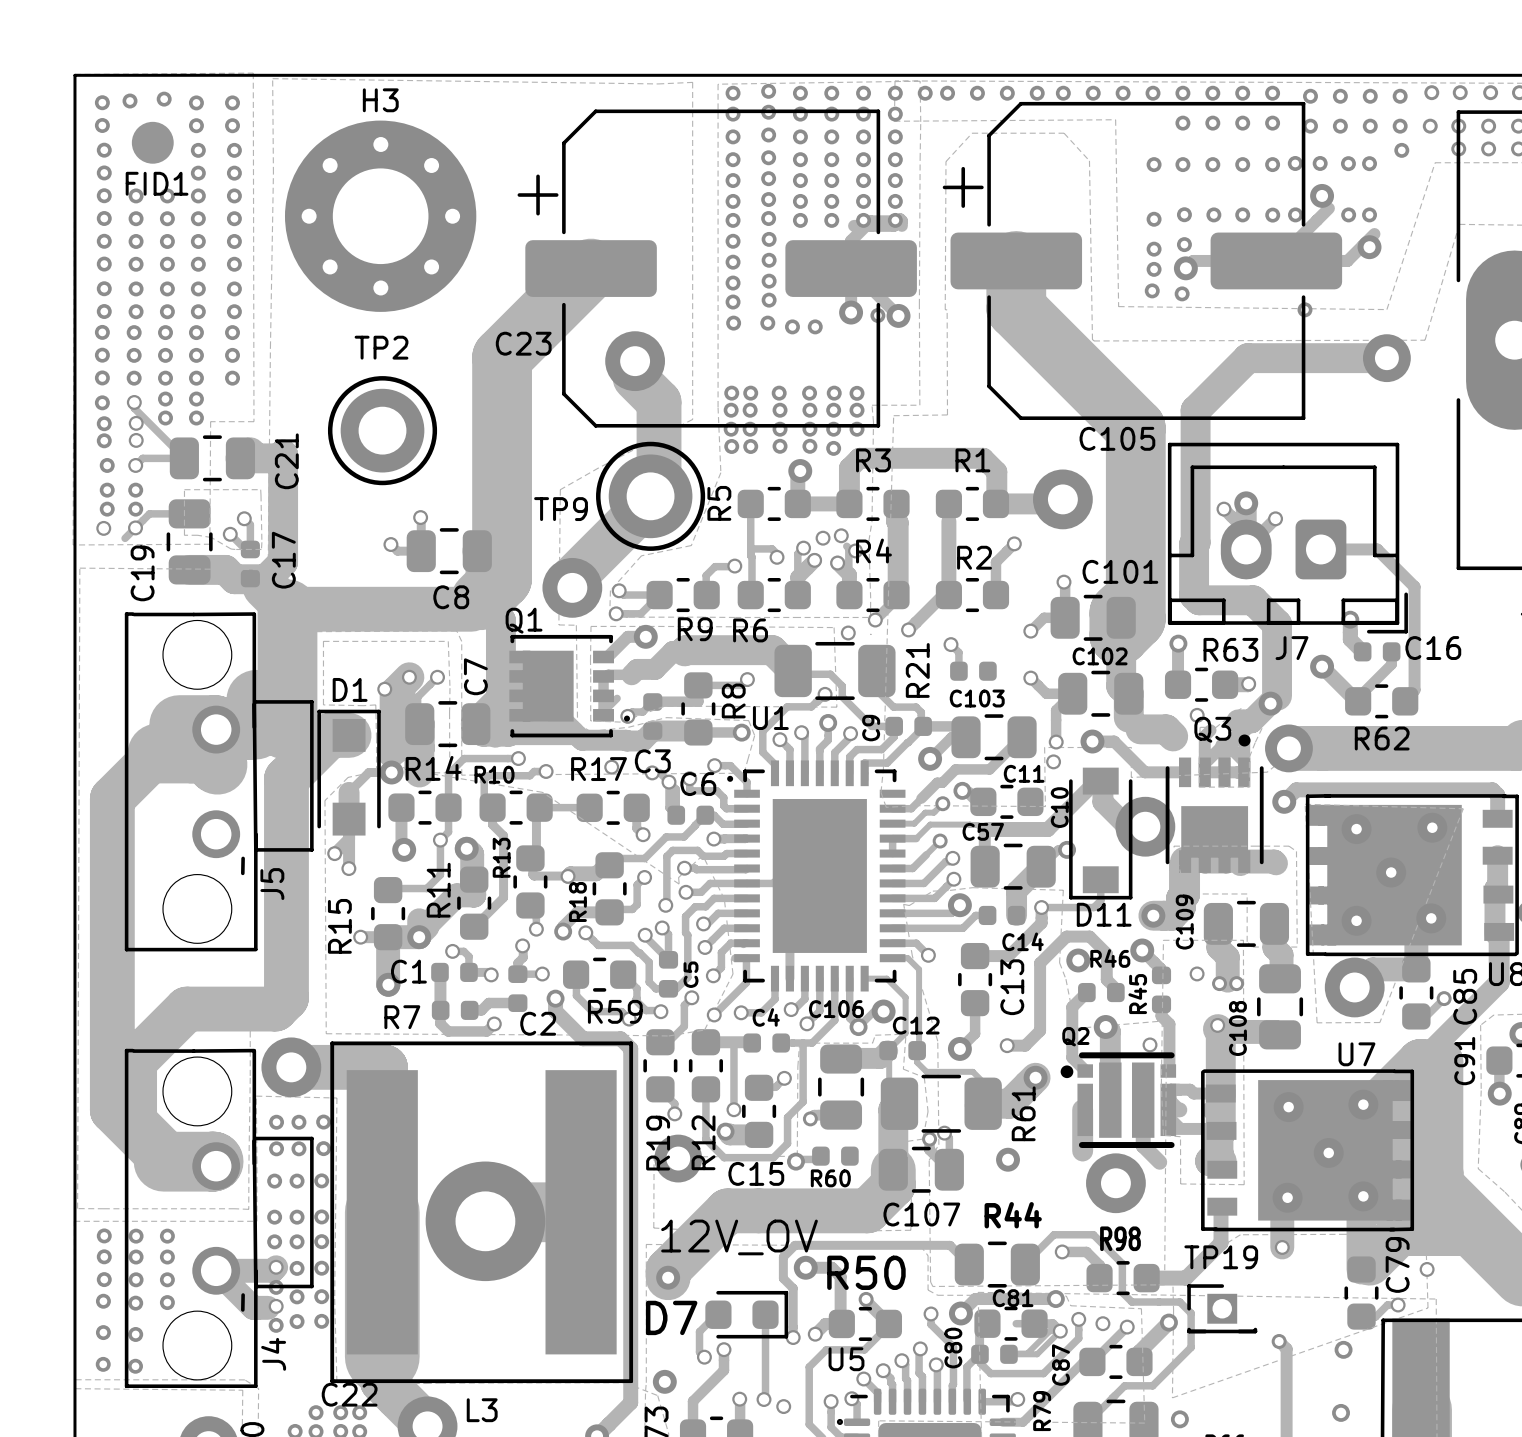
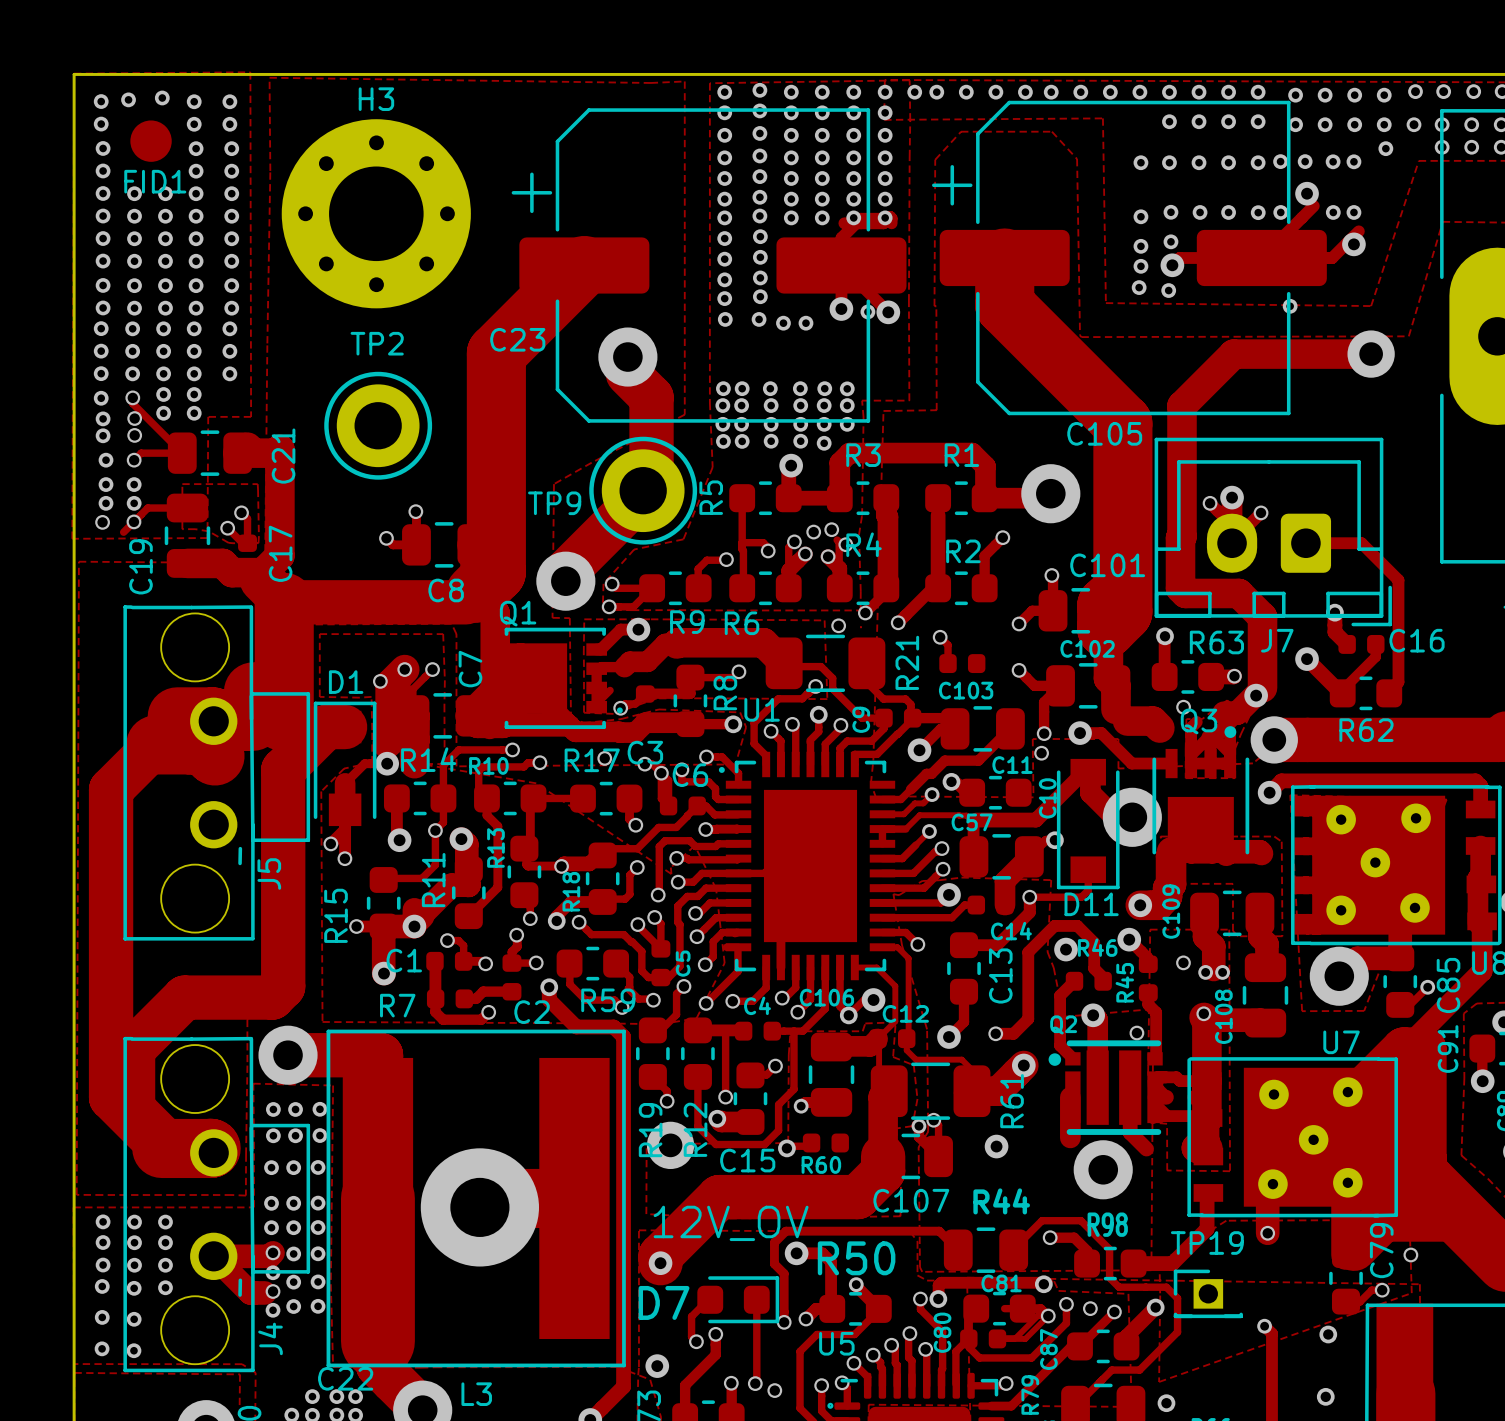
track: (1055, 1299) (975, 1299) (960, 1313) -> (1043, 1284) (941, 1282) (938, 1285) (938, 1298)
via size: [948, 1301, 973, 1326] -> [929, 1290, 948, 1308]

